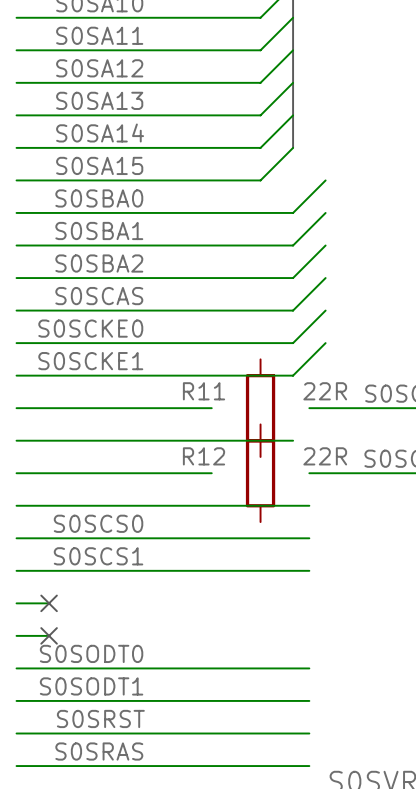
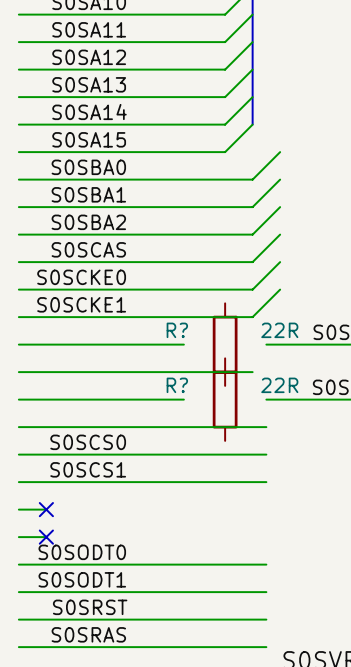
R11 name: R11 (204, 391) -> R? (177, 330)
R12 name: R12 (204, 456) -> R? (177, 385)

